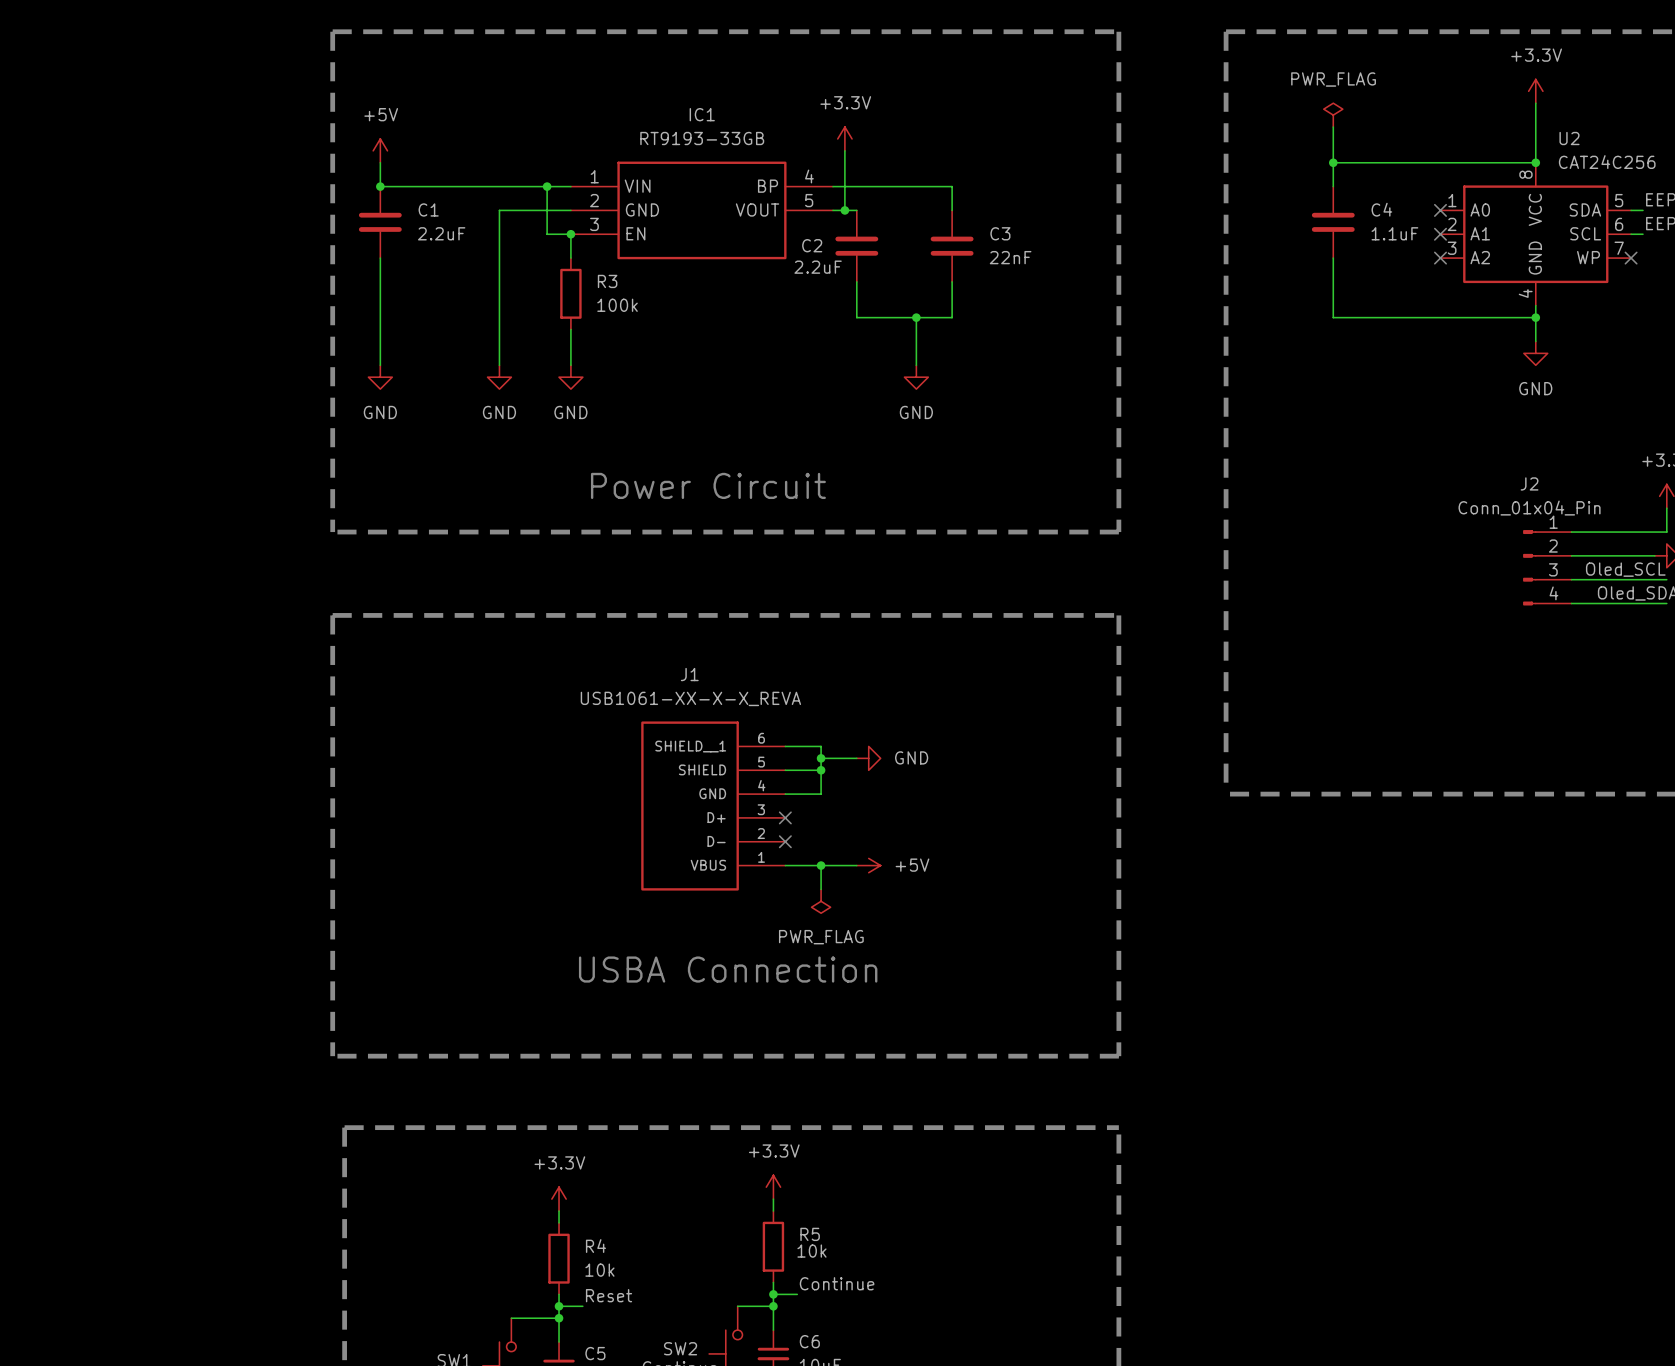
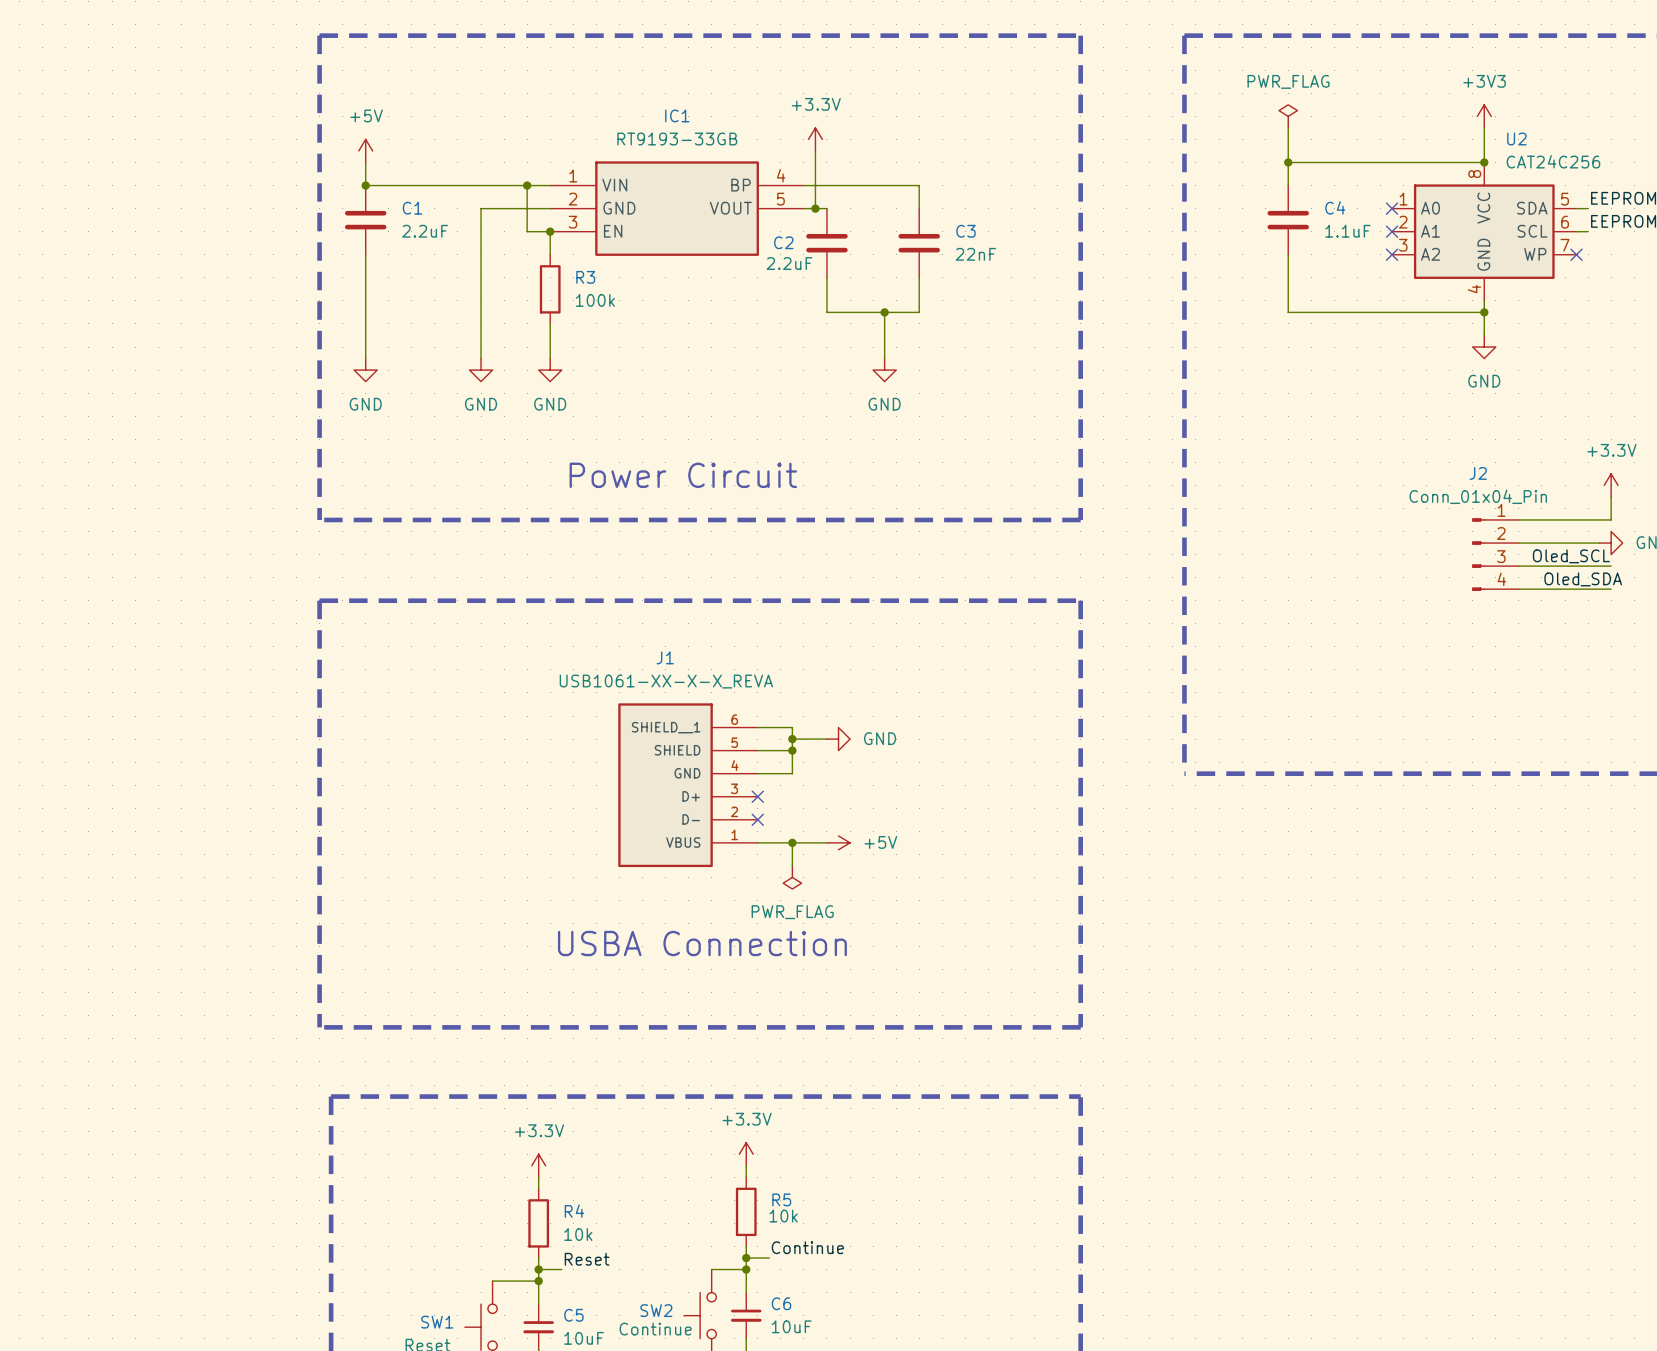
power symbol: +3.3V (1535, 91) -> none
power symbol: none -> +3V3 (1484, 116)

